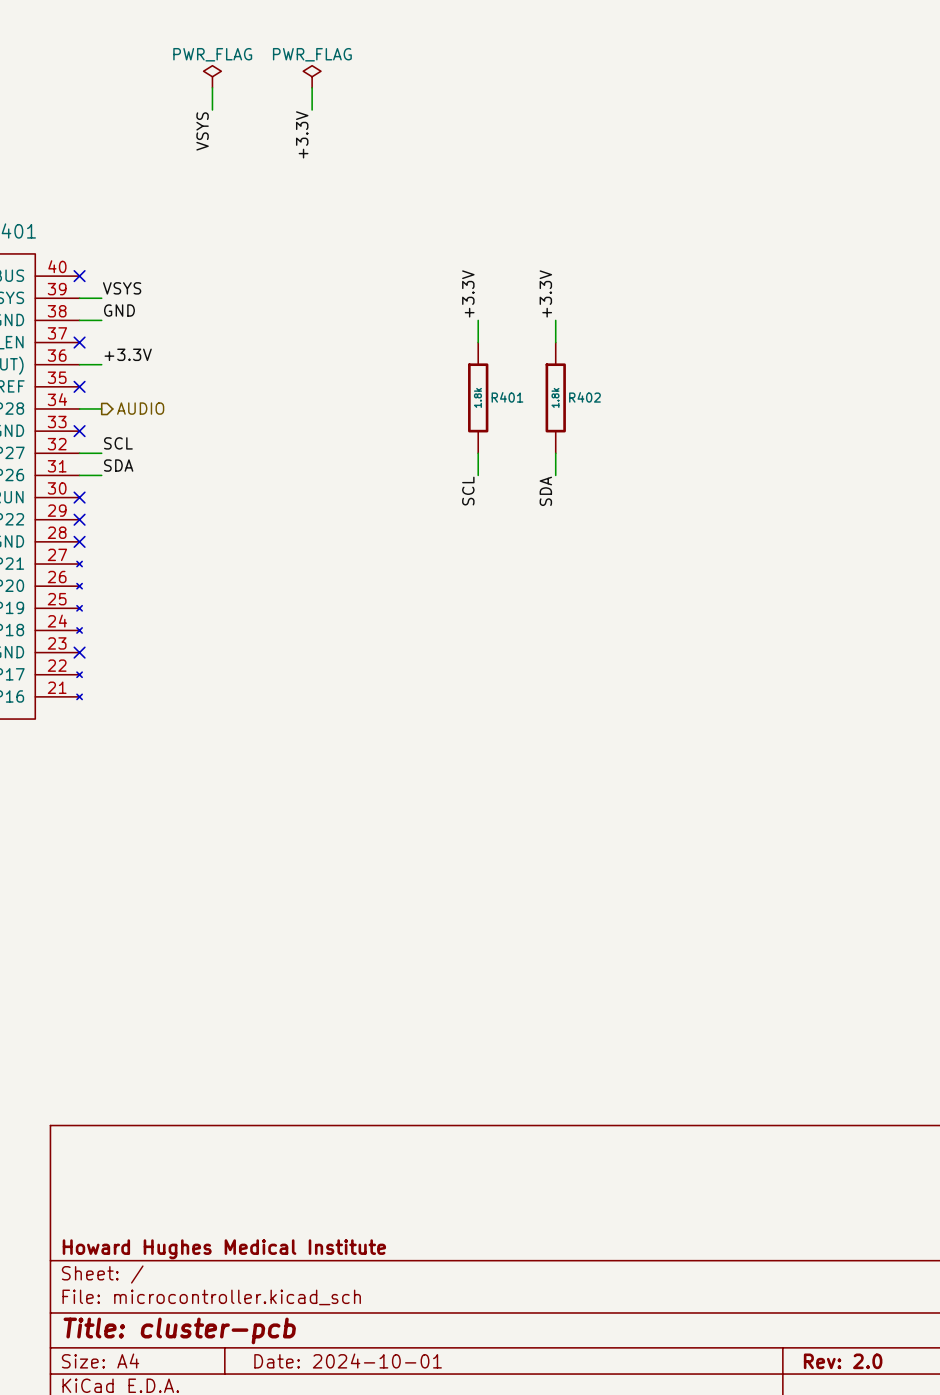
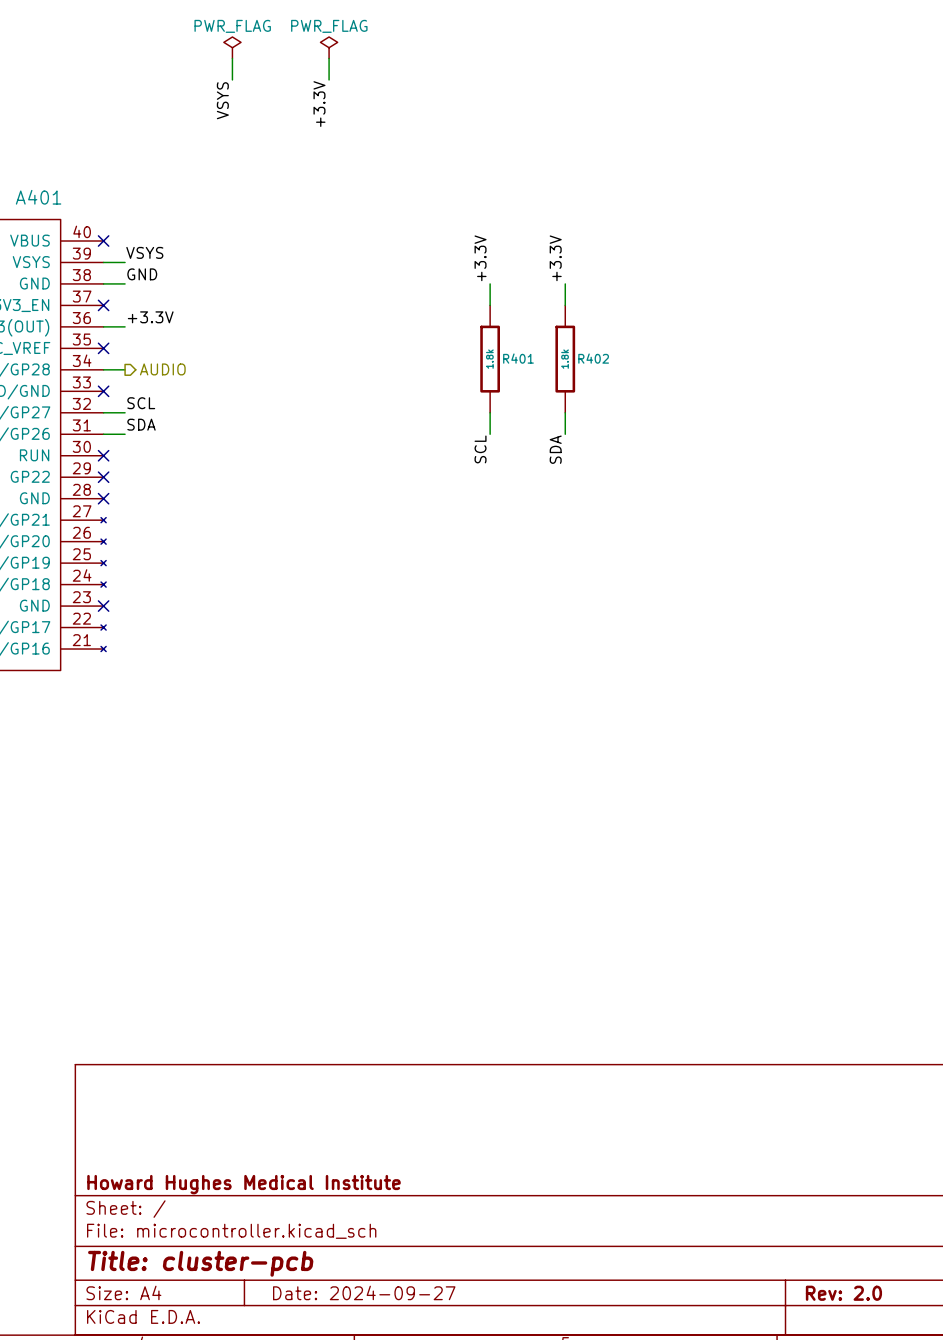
title block: Date: 2024-10-01 (348, 1361) -> Date: 2024-09-27 (364, 1292)

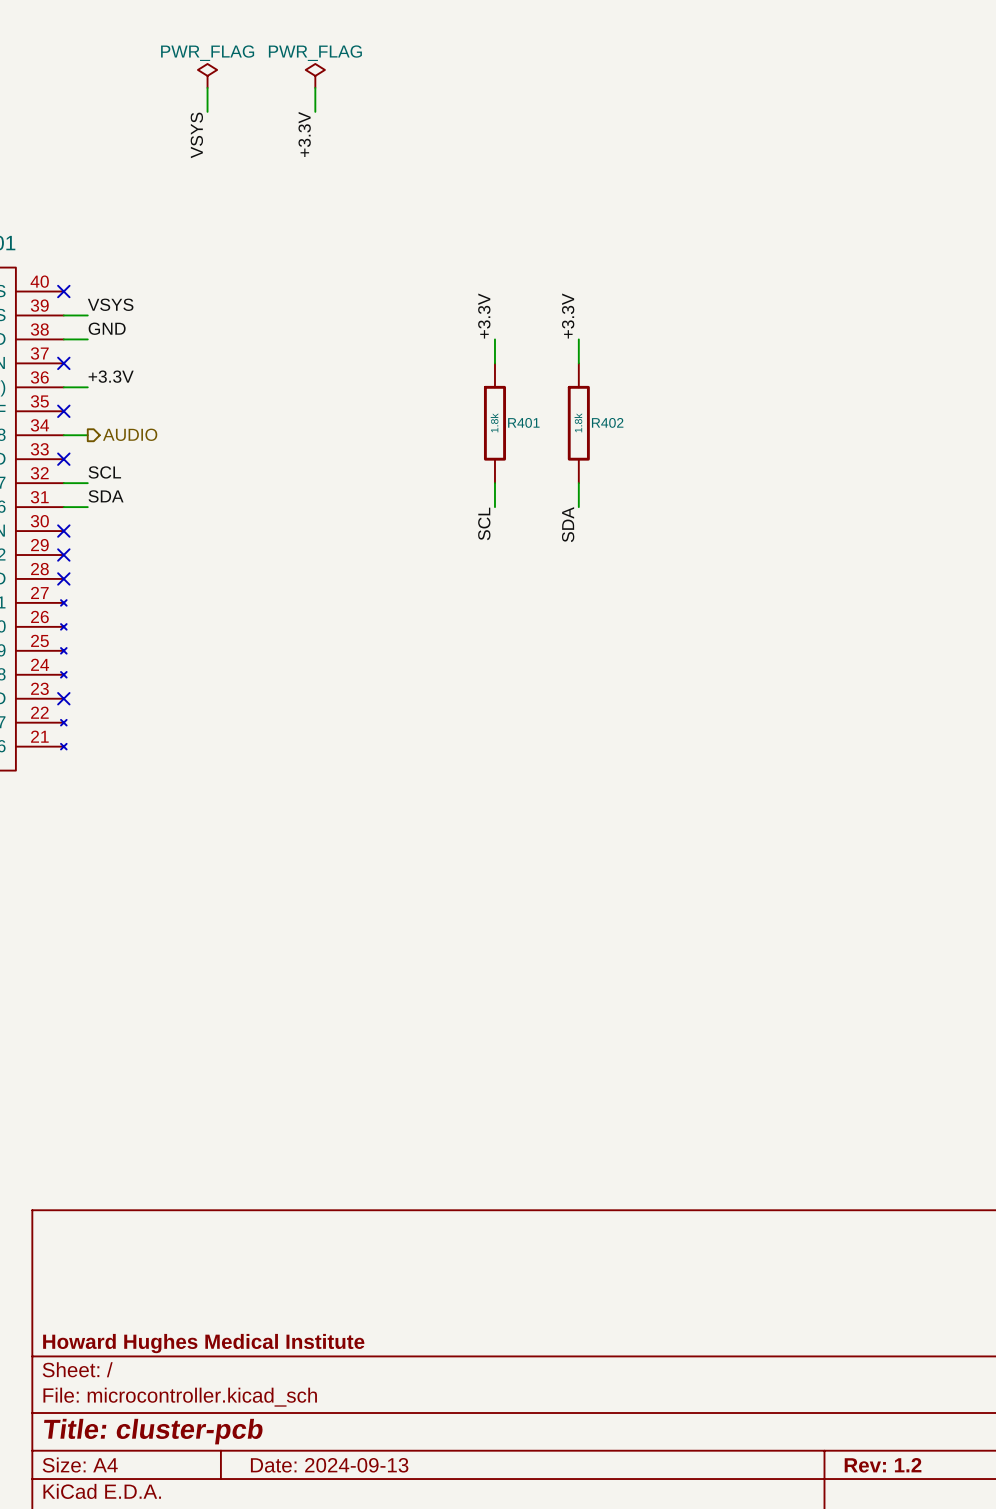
title block: Date: 2024-09-27 (364, 1292) -> Date: 2024-09-13 (329, 1465)
title block: Rev: 2.0 (843, 1293) -> Rev: 1.2 (883, 1465)

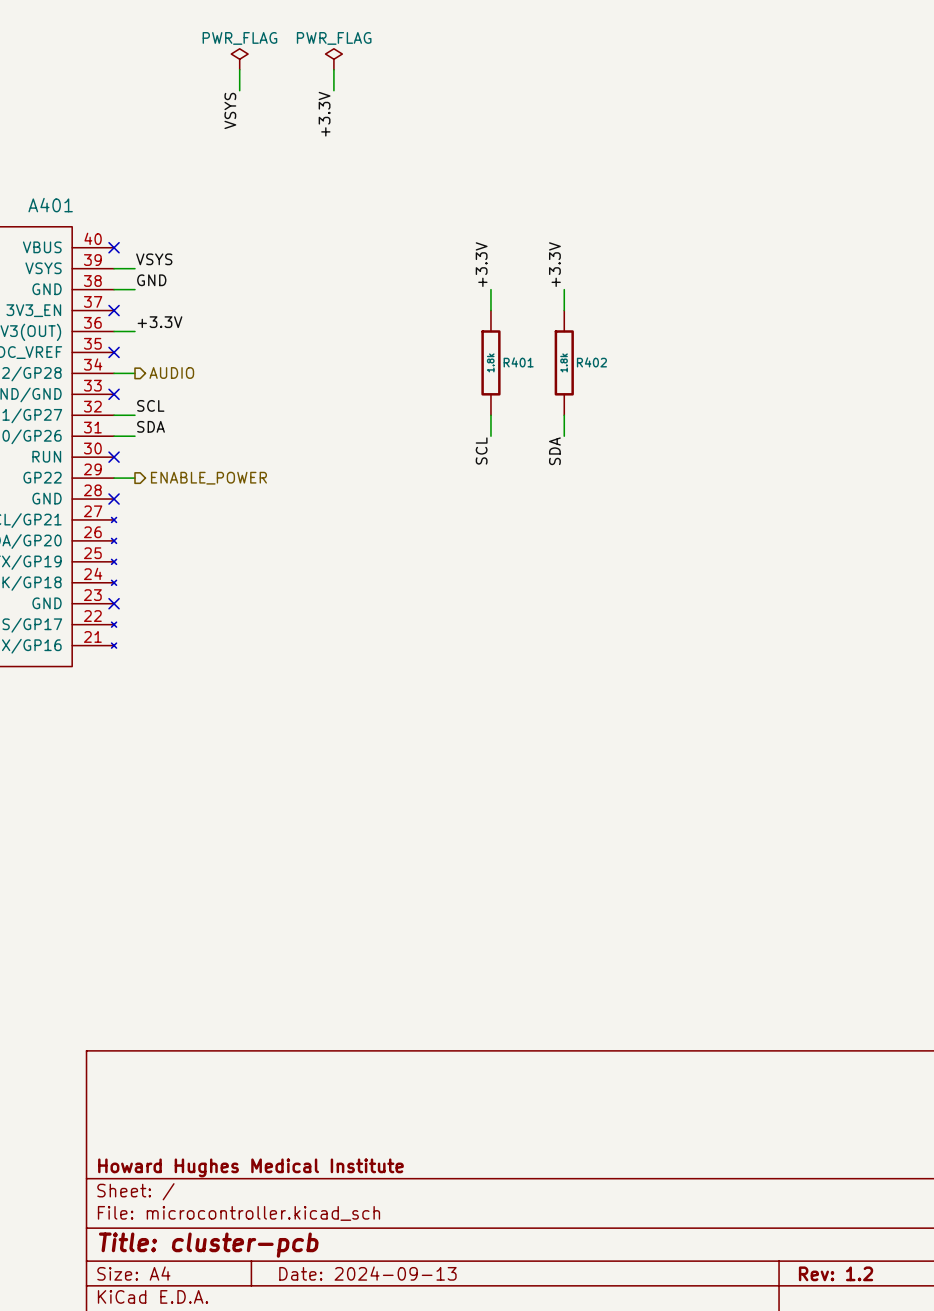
wire: none -> (114, 478) (134, 478)
no-connect mark: (63, 555) -> none
hierarchical label: none -> ENABLE_POWER (208, 478)

